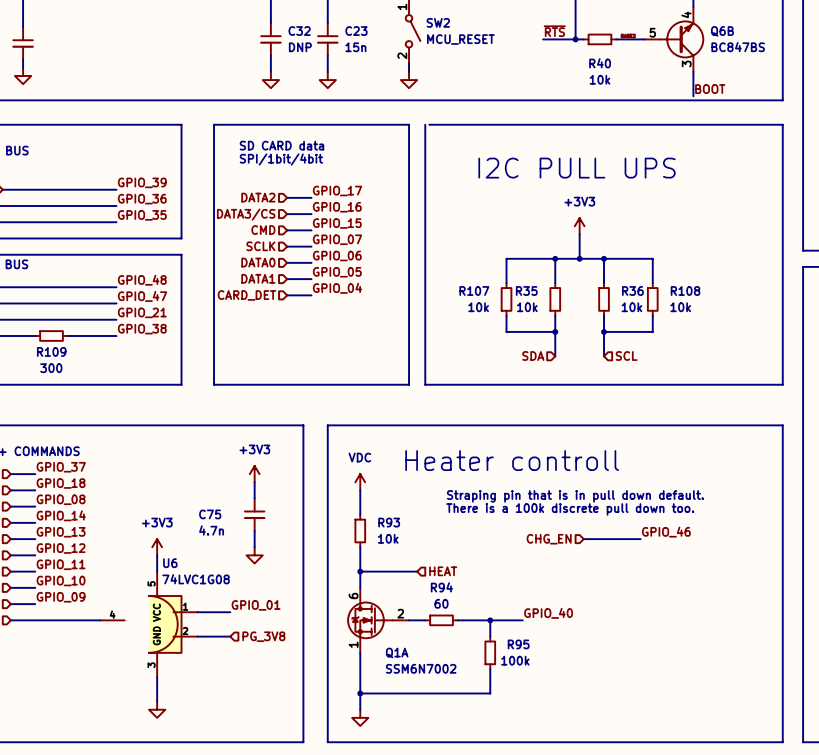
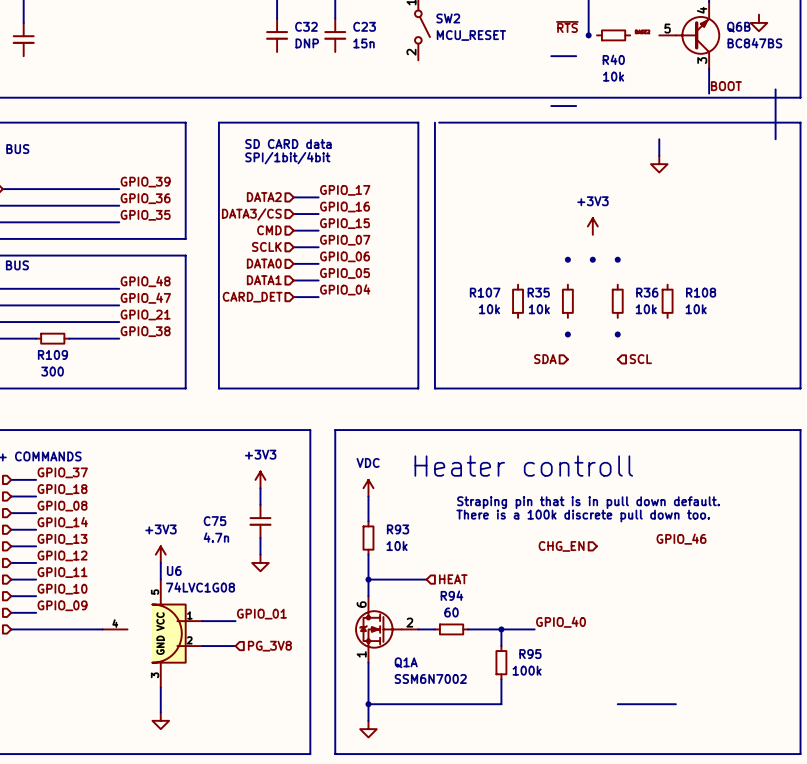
power symbol: none -> (758, 22)
wire: (543, 39) (583, 39) -> none
wire: (616, 39) (644, 39) -> none
wire: (270, 55) (270, 71) -> none
wire: (327, 55) (327, 71) -> none
wire: (23, 59) (23, 67) -> none
wire: none -> (551, 56) (576, 56)
wire: (409, 63) (409, 71) -> none
power symbol: (23, 75) -> none
power symbol: (270, 80) -> none
power symbol: (327, 80) -> none
power symbol: (409, 80) -> none
wire: none -> (775, 89) (775, 139)
wire: none -> (551, 106) (576, 106)
wire: none -> (659, 139) (659, 155)
power symbol: none -> (659, 164)
text: I2C PULL UPS (577, 168) -> none
wire: (579, 234) (579, 258) -> none
wire: (555, 258) (555, 283) -> none
wire: (604, 258) (604, 283) -> none
wire: (506, 283) (506, 258) (652, 258) (652, 283) -> none
wire: (506, 315) (506, 331) (555, 331) -> none
wire: (555, 315) (555, 356) -> none
wire: (604, 315) (604, 356) -> none
wire: (652, 315) (652, 331) (604, 331) -> none
wire: (583, 539) (640, 539) -> (617, 704) (675, 704)

